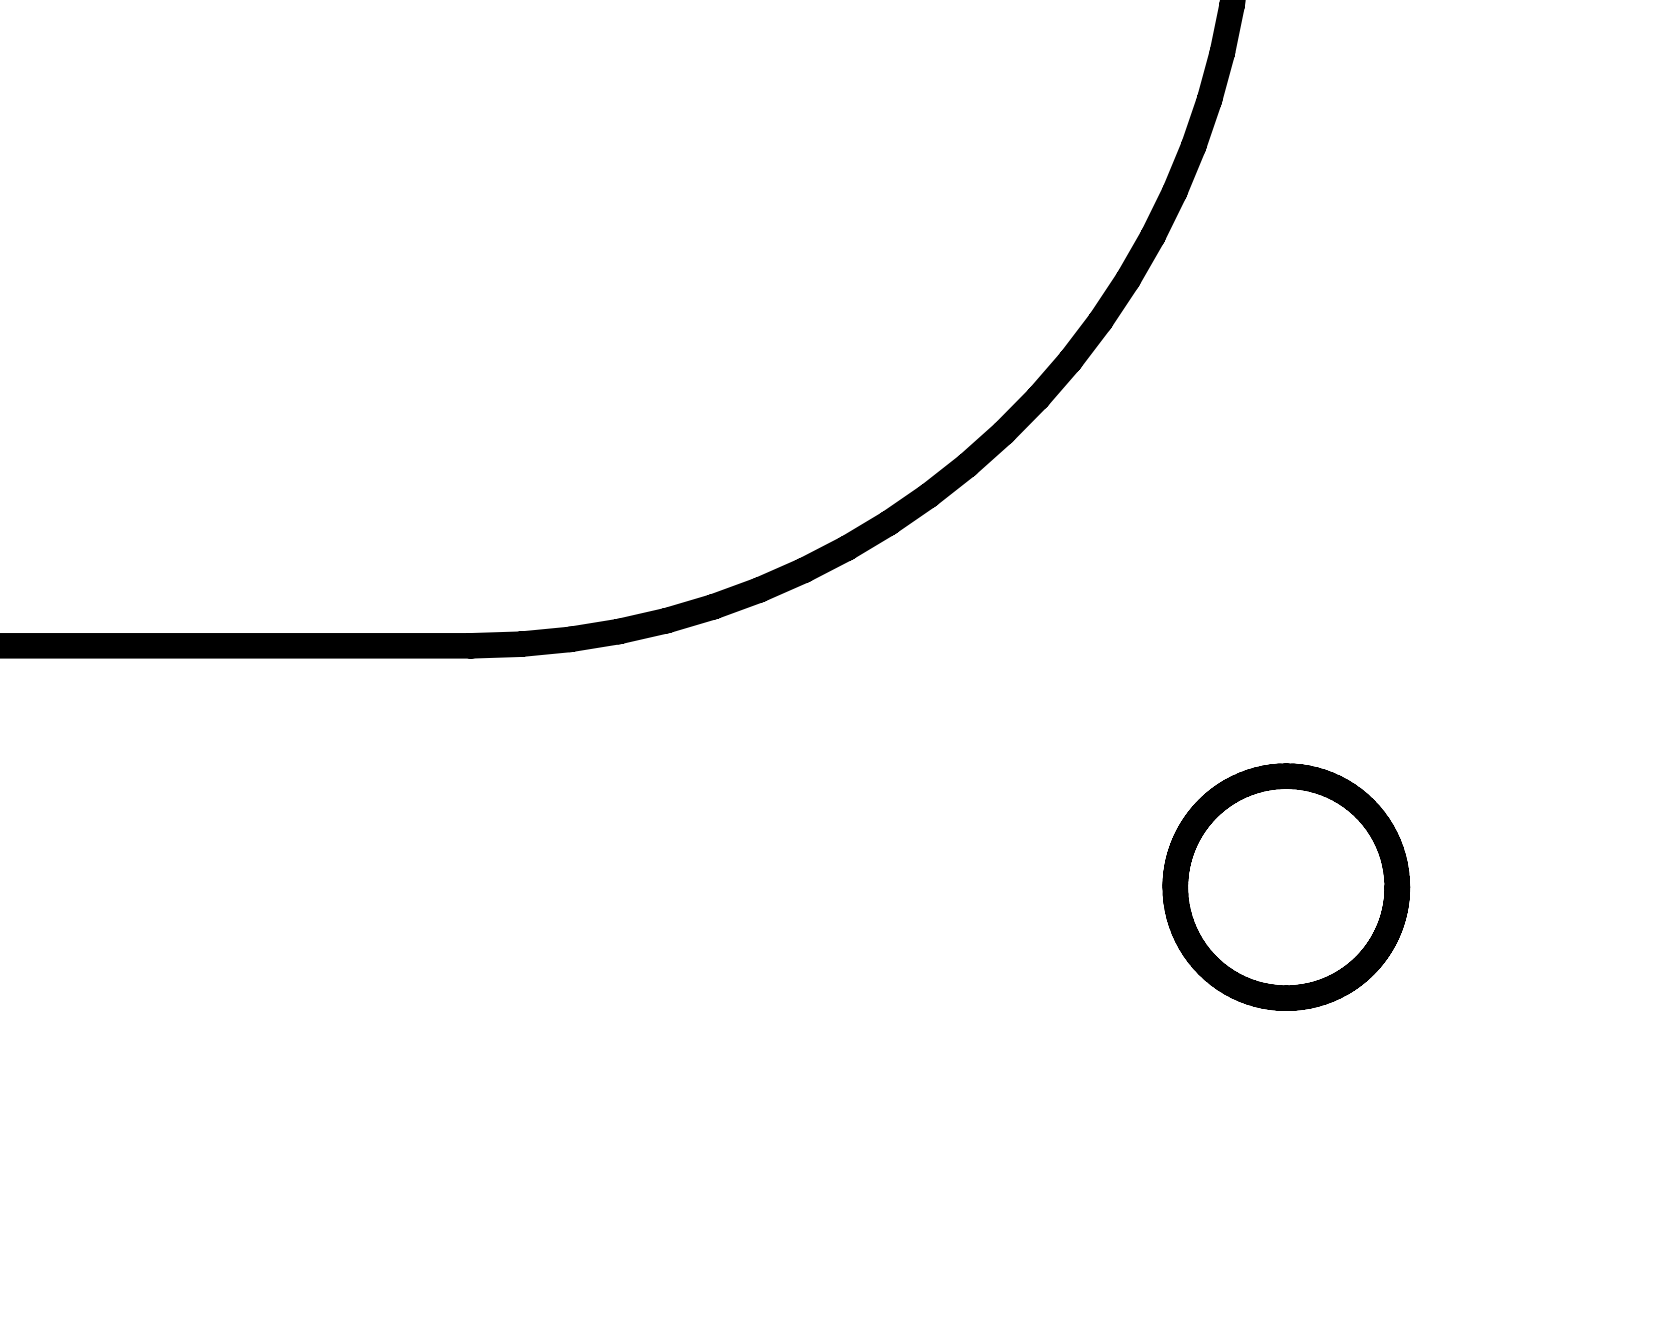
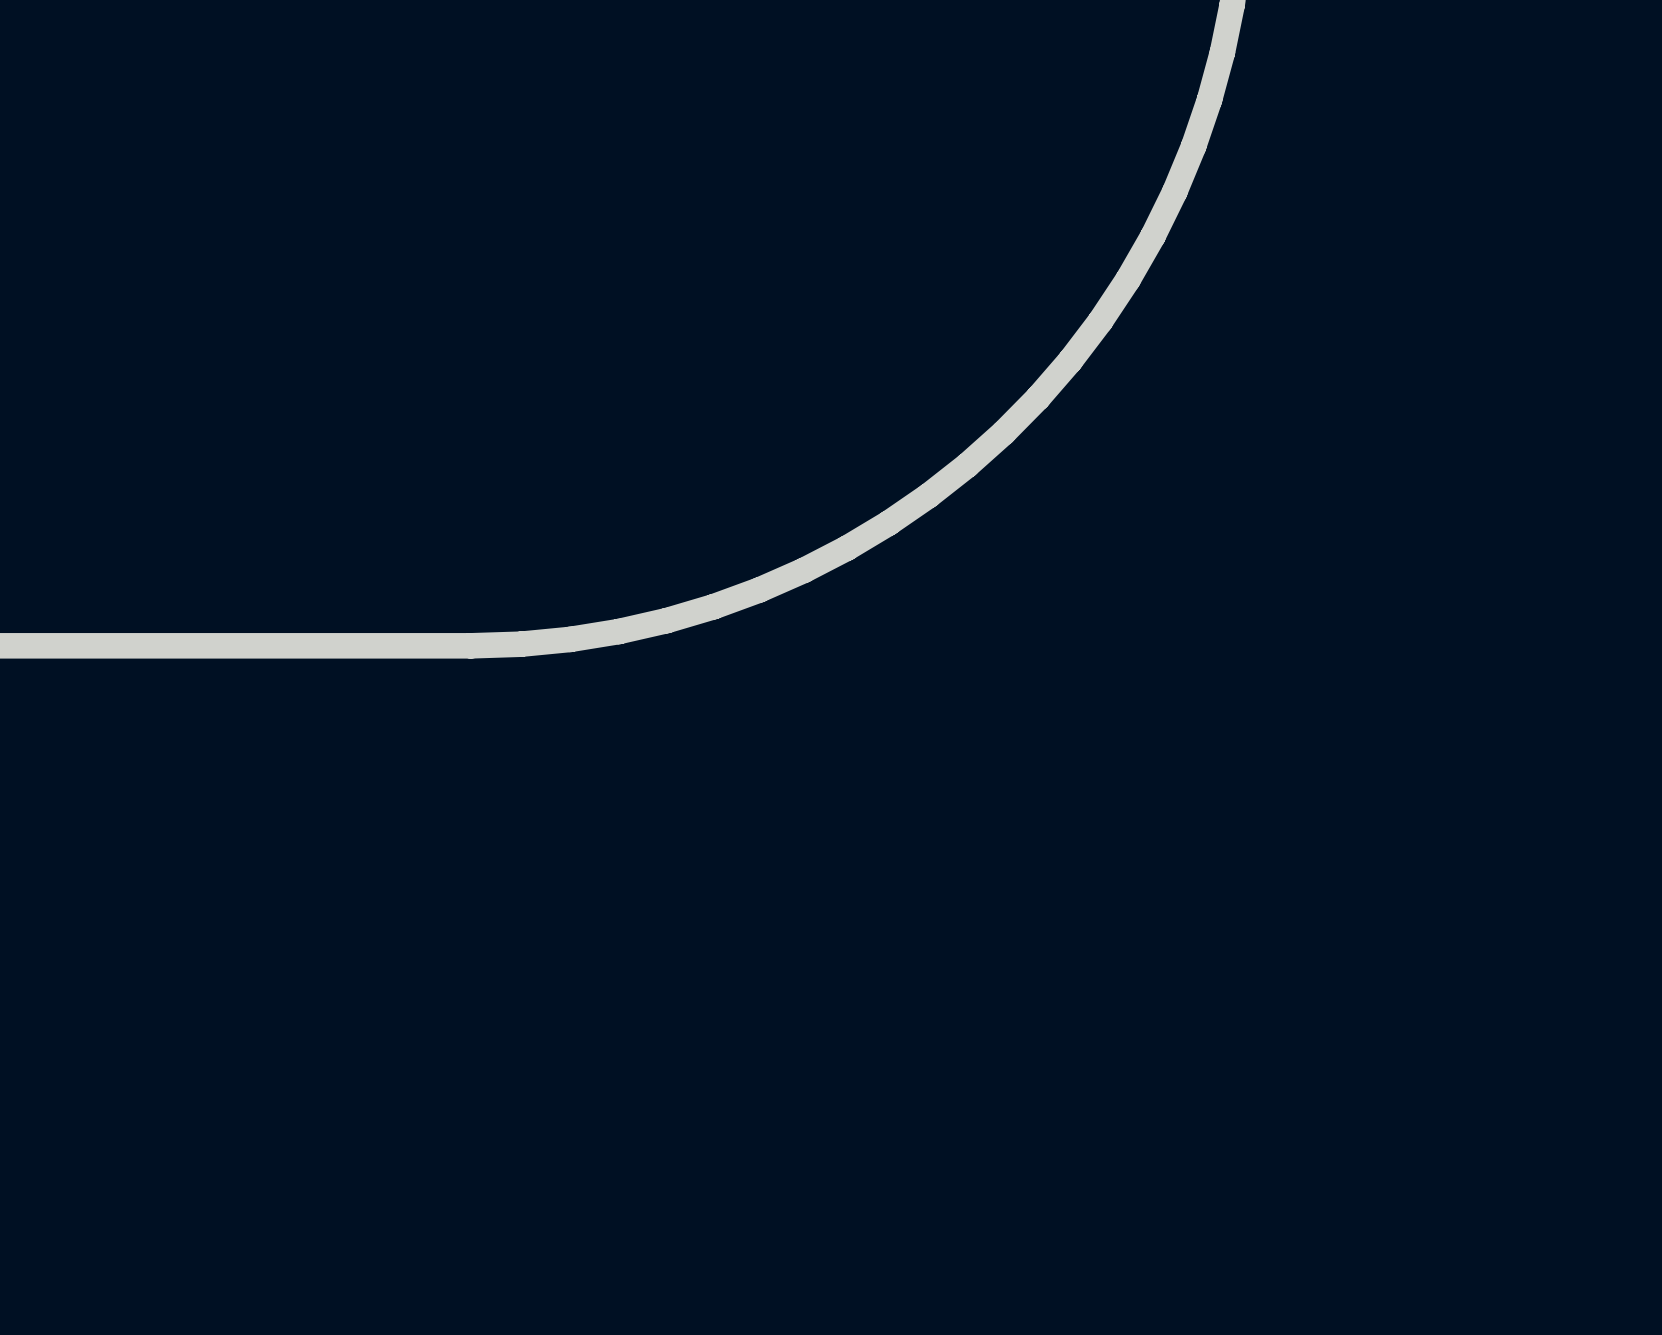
board edge: (1286, 776) (1307, 778) (1328, 784) (1348, 794) (1365, 808) (1378, 825) (1388, 844) (1395, 865) (1397, 887) (1395, 909) (1388, 929) (1378, 948) (1365, 965) (1348, 979) (1328, 989) (1307, 996) (1286, 998) (1264, 996) (1244, 989) (1224, 979) (1207, 965) (1193, 948) (1183, 929) (1177, 909) (1175, 887) (1177, 865) (1183, 844) (1193, 825) (1207, 808) (1224, 794) (1244, 784) (1264, 778) (1286, 776) -> none

